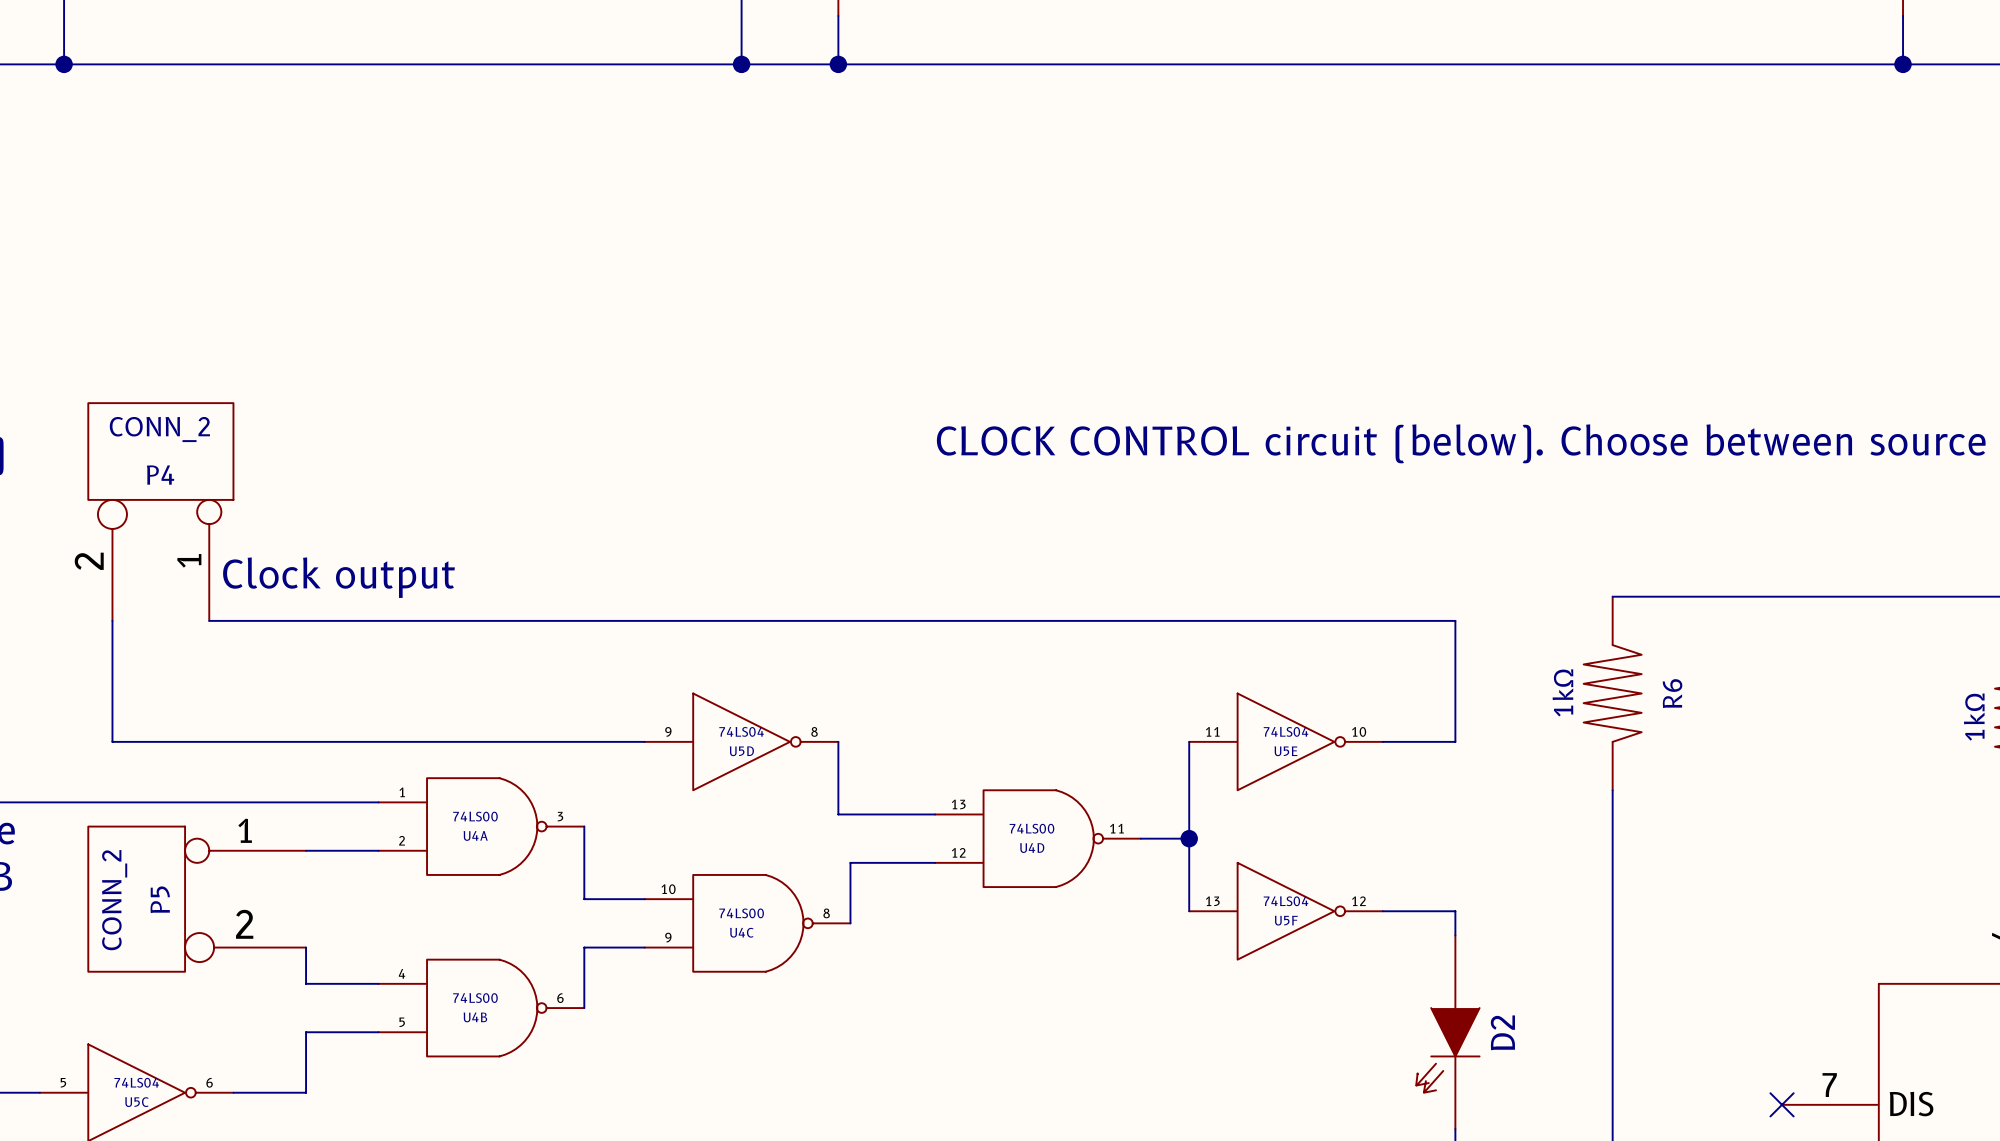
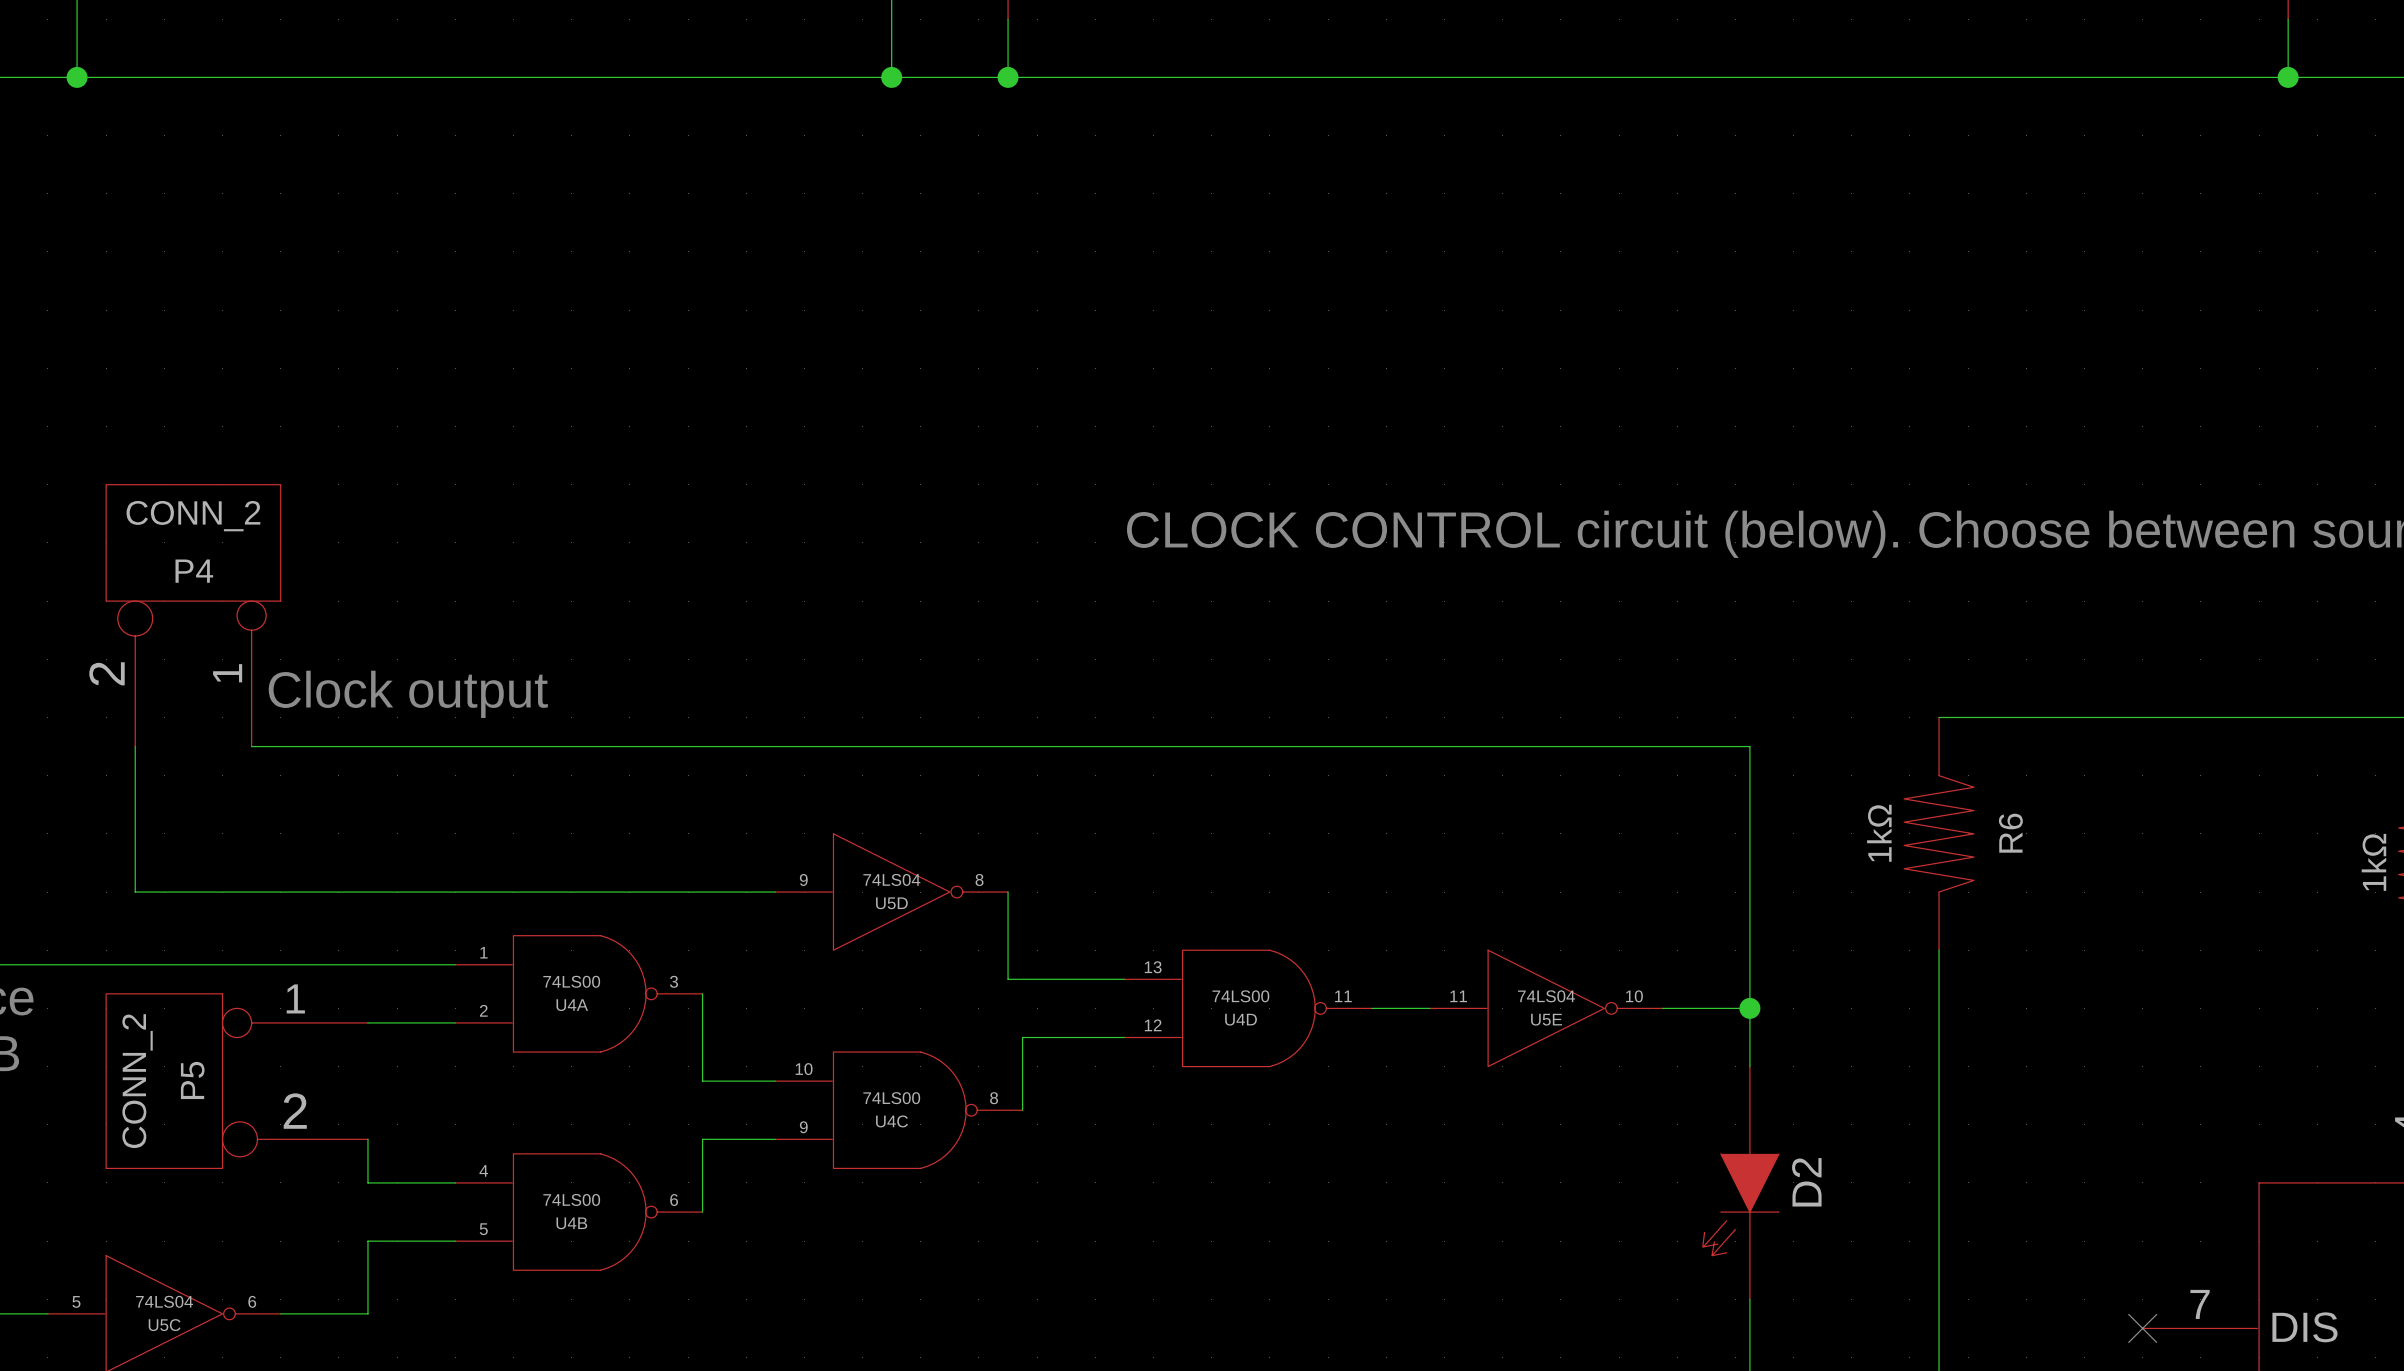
wire: (1189, 741) (1189, 911) -> none
U5E position: (1286, 741) -> (1546, 1008)
wire: (1382, 741) (1455, 741) -> (1749, 1066) (1749, 892)
junction: (1189, 838) -> none
wire: none -> (1662, 1008) (1749, 1008)
junction: none -> (1749, 1008)
U5F: 74LS04 (1286, 911) -> none
wire: (1382, 911) (1455, 911) (1455, 935) -> none
D2 position: (1447, 1032) -> (1740, 1182)

